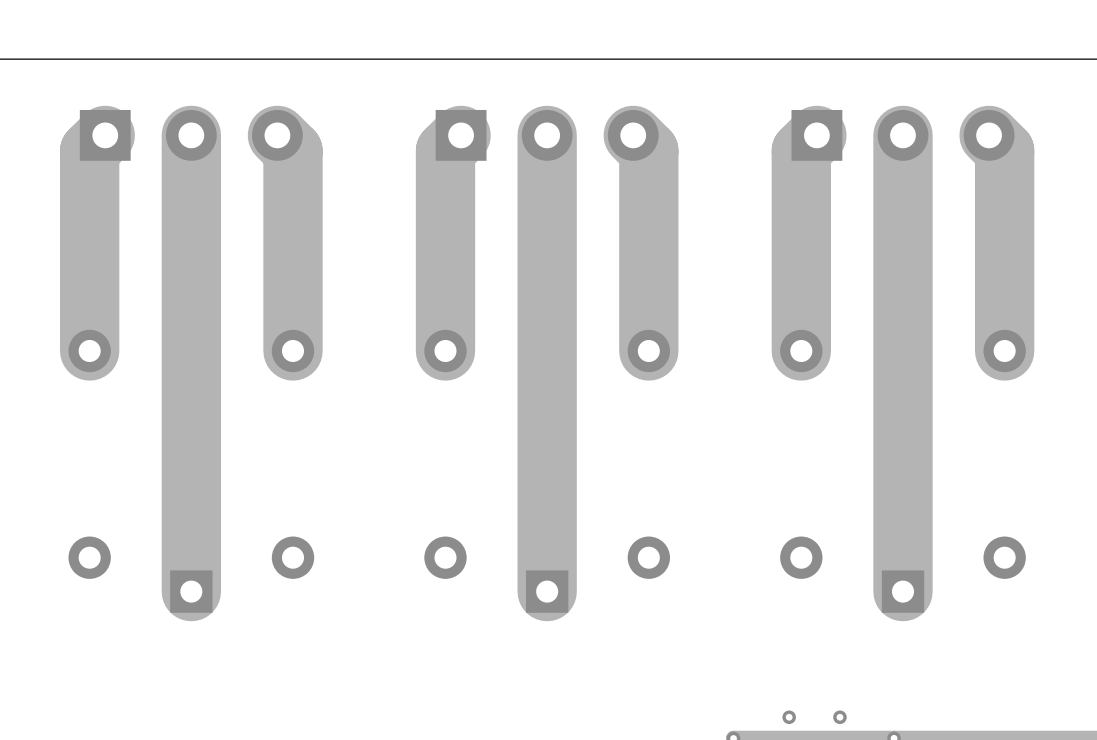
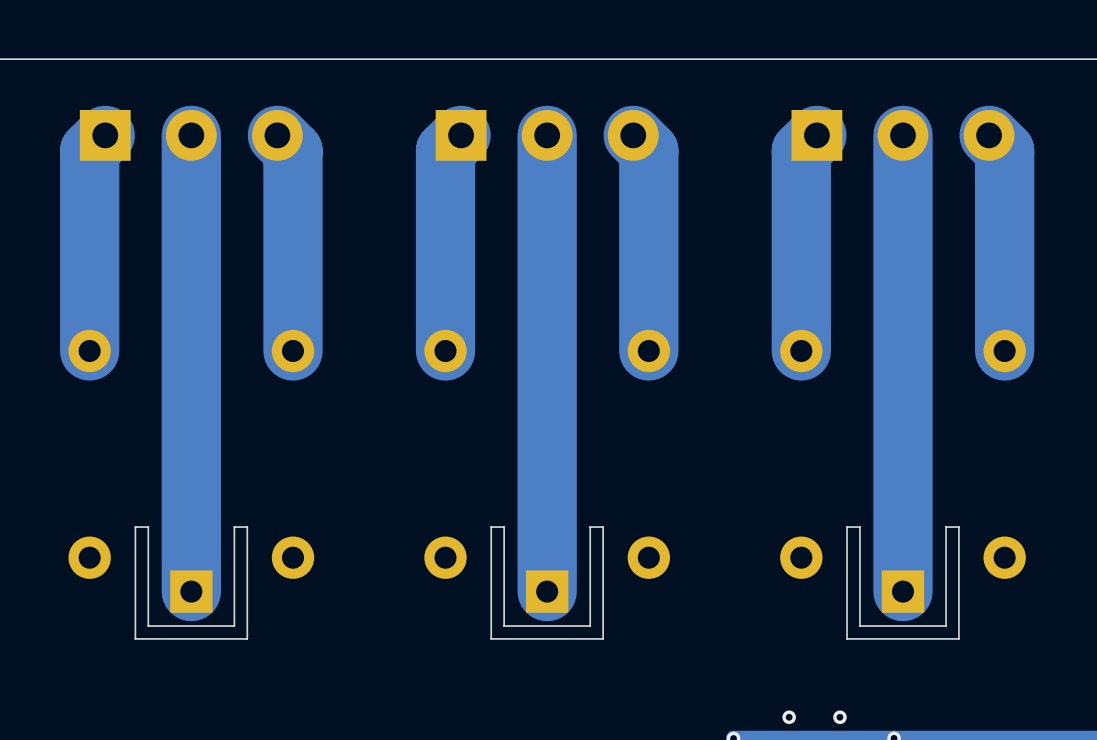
board edge: none -> (247, 527) (234, 527) (234, 626) (148, 626) (148, 527) (135, 527) (135, 638) (247, 638) (247, 527)
board edge: none -> (603, 527) (590, 527) (590, 626) (504, 626) (504, 527) (491, 527) (491, 638) (603, 638) (603, 527)
board edge: none -> (958, 527) (946, 527) (946, 626) (859, 626) (859, 527) (847, 527) (847, 638) (958, 638) (958, 527)

